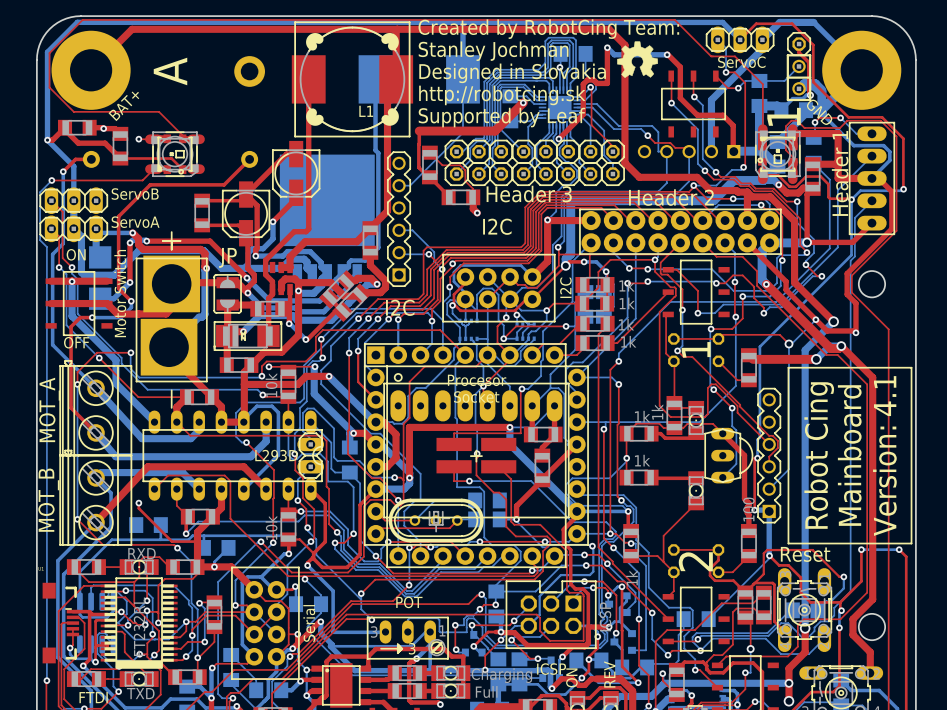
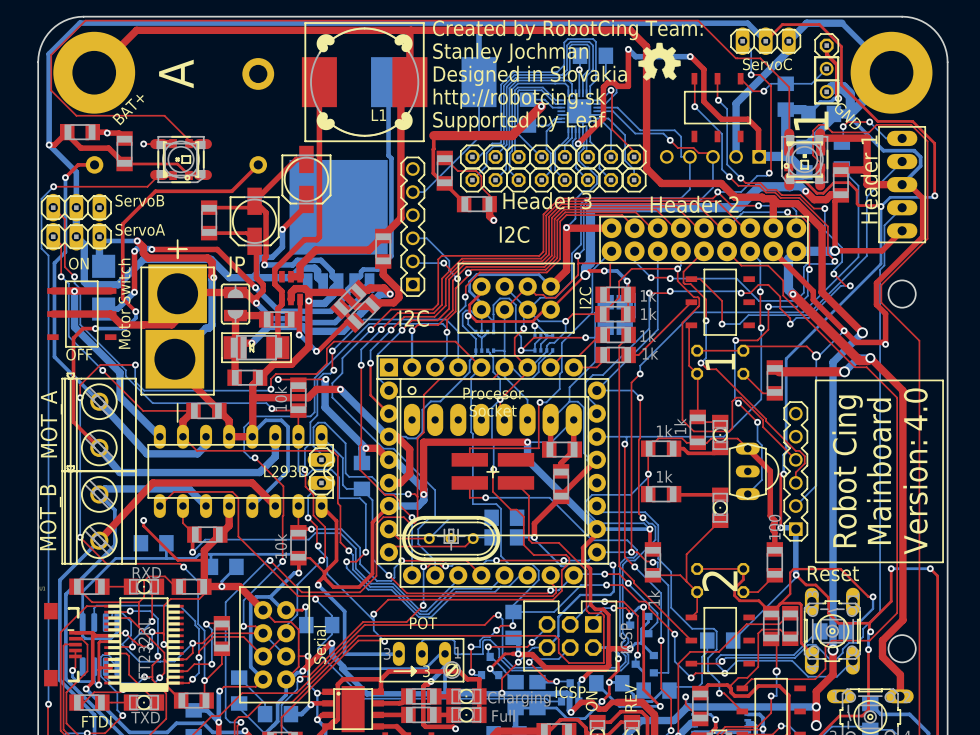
drawing shape: [787, 367, 913, 545] -> [815, 379, 944, 563]

